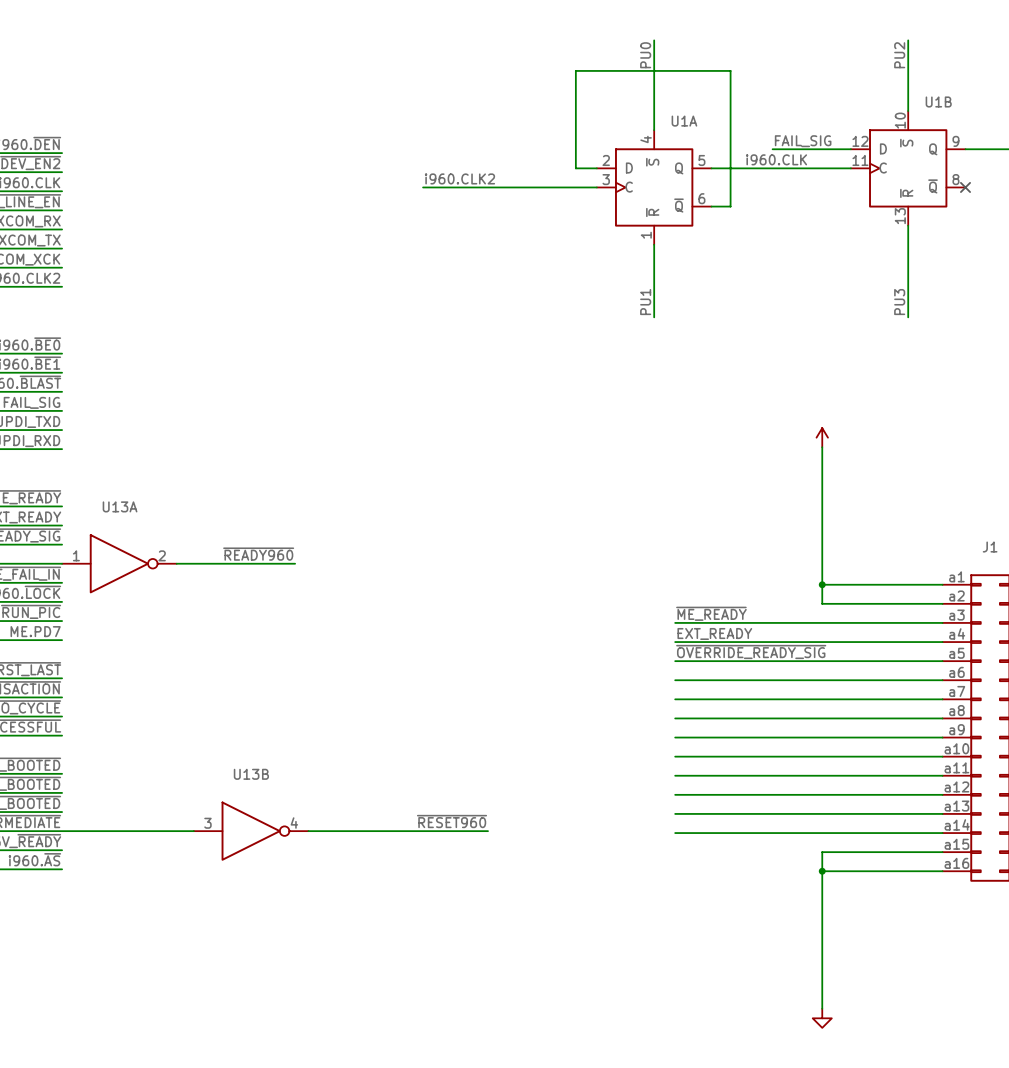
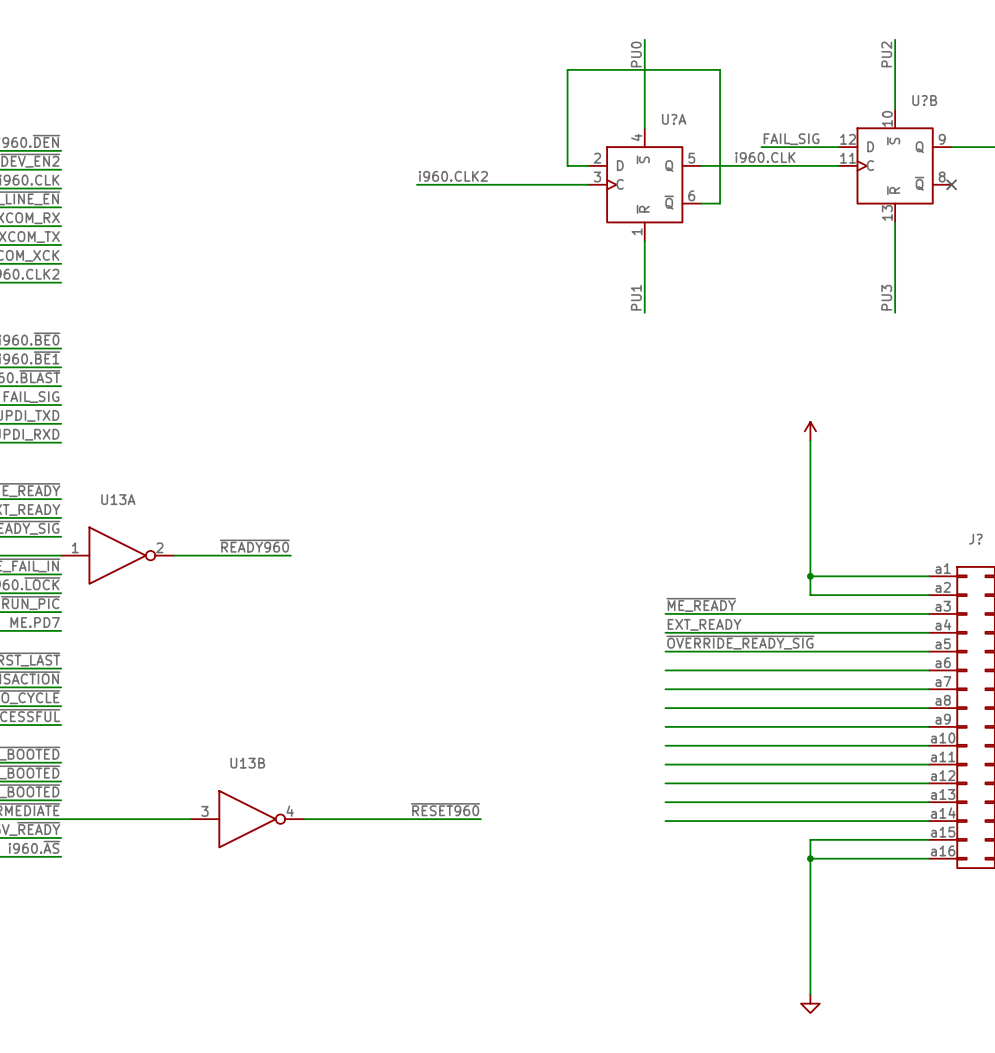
U1B name: U1B (938, 101) -> U?B (924, 100)
U1A name: U1A (684, 121) -> U?A (674, 119)
J1 name: J1 (990, 547) -> J? (975, 539)

